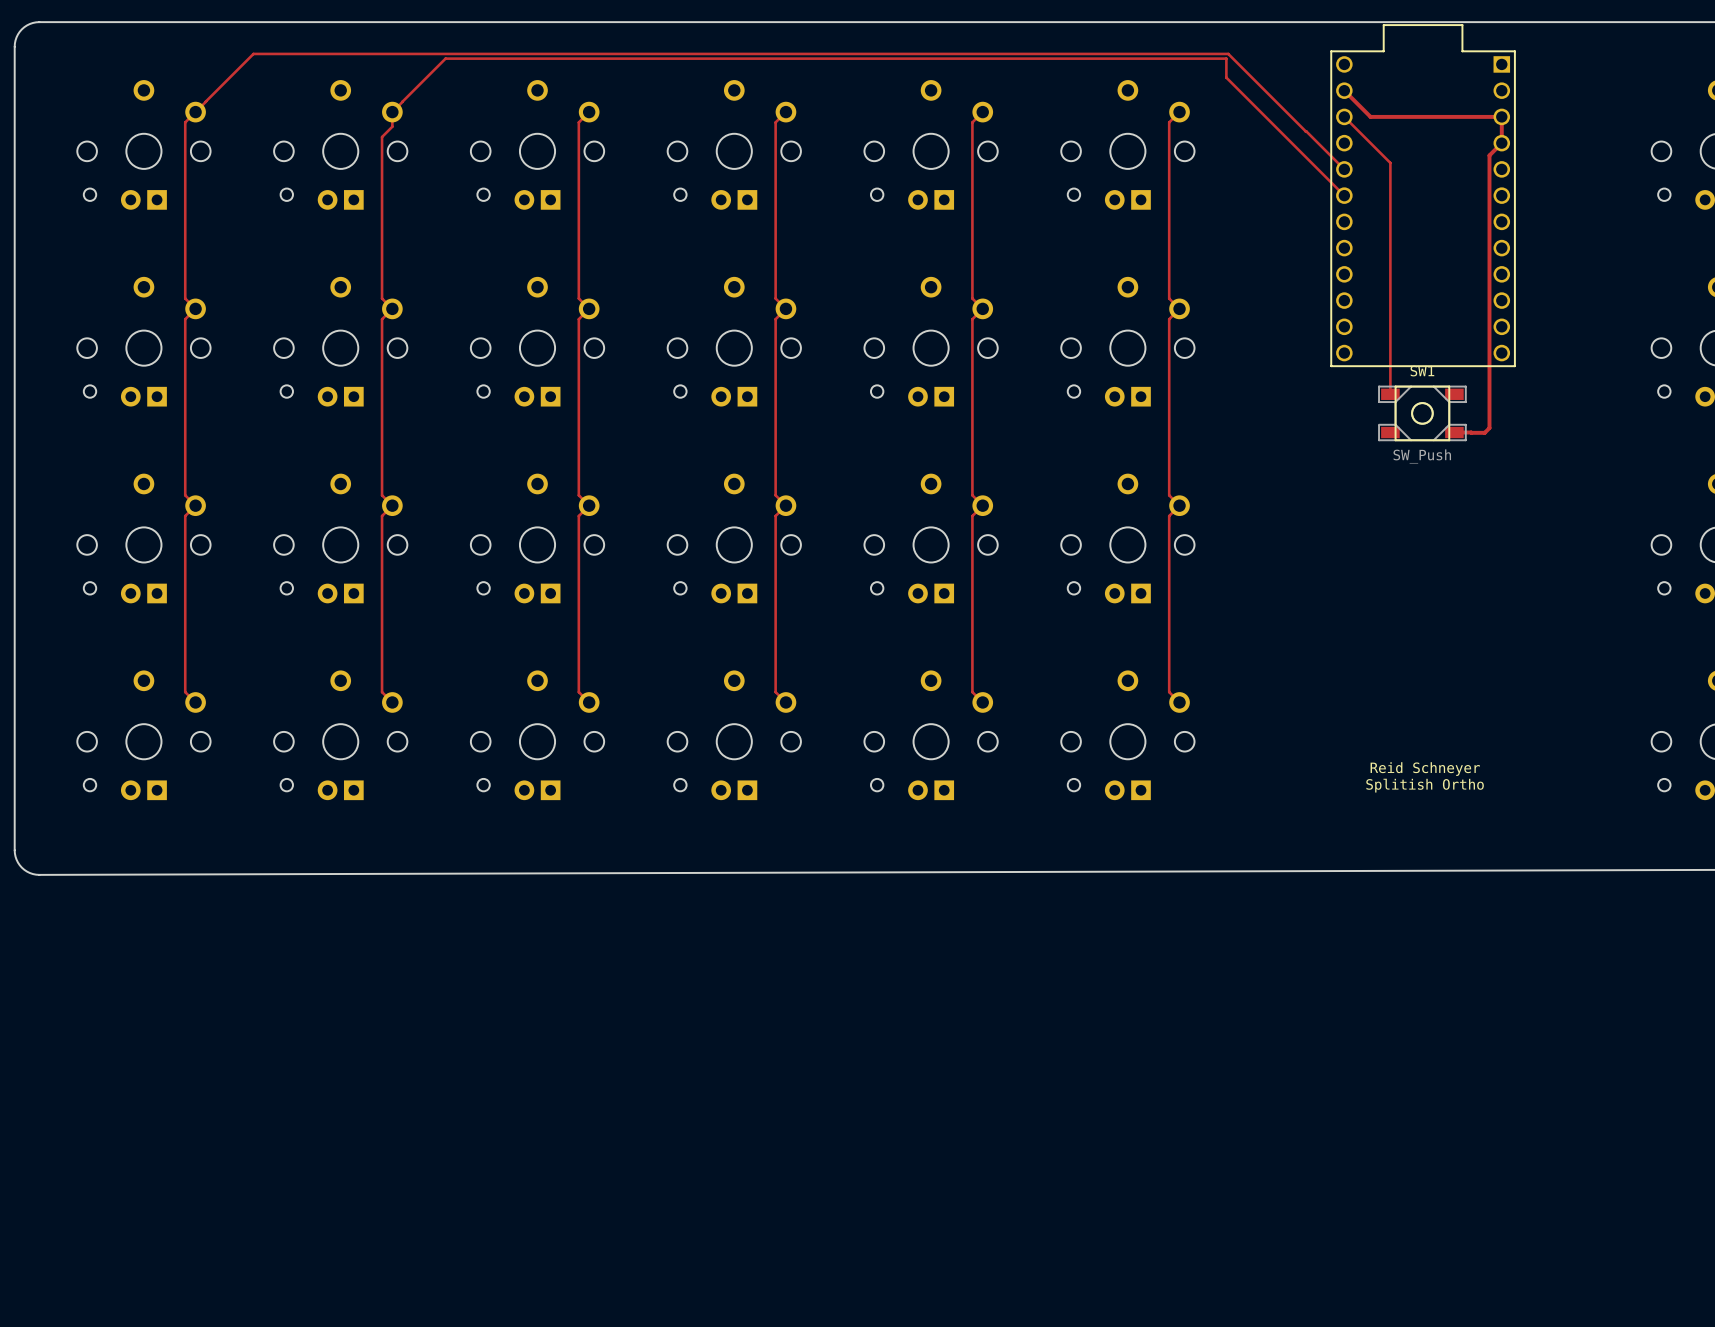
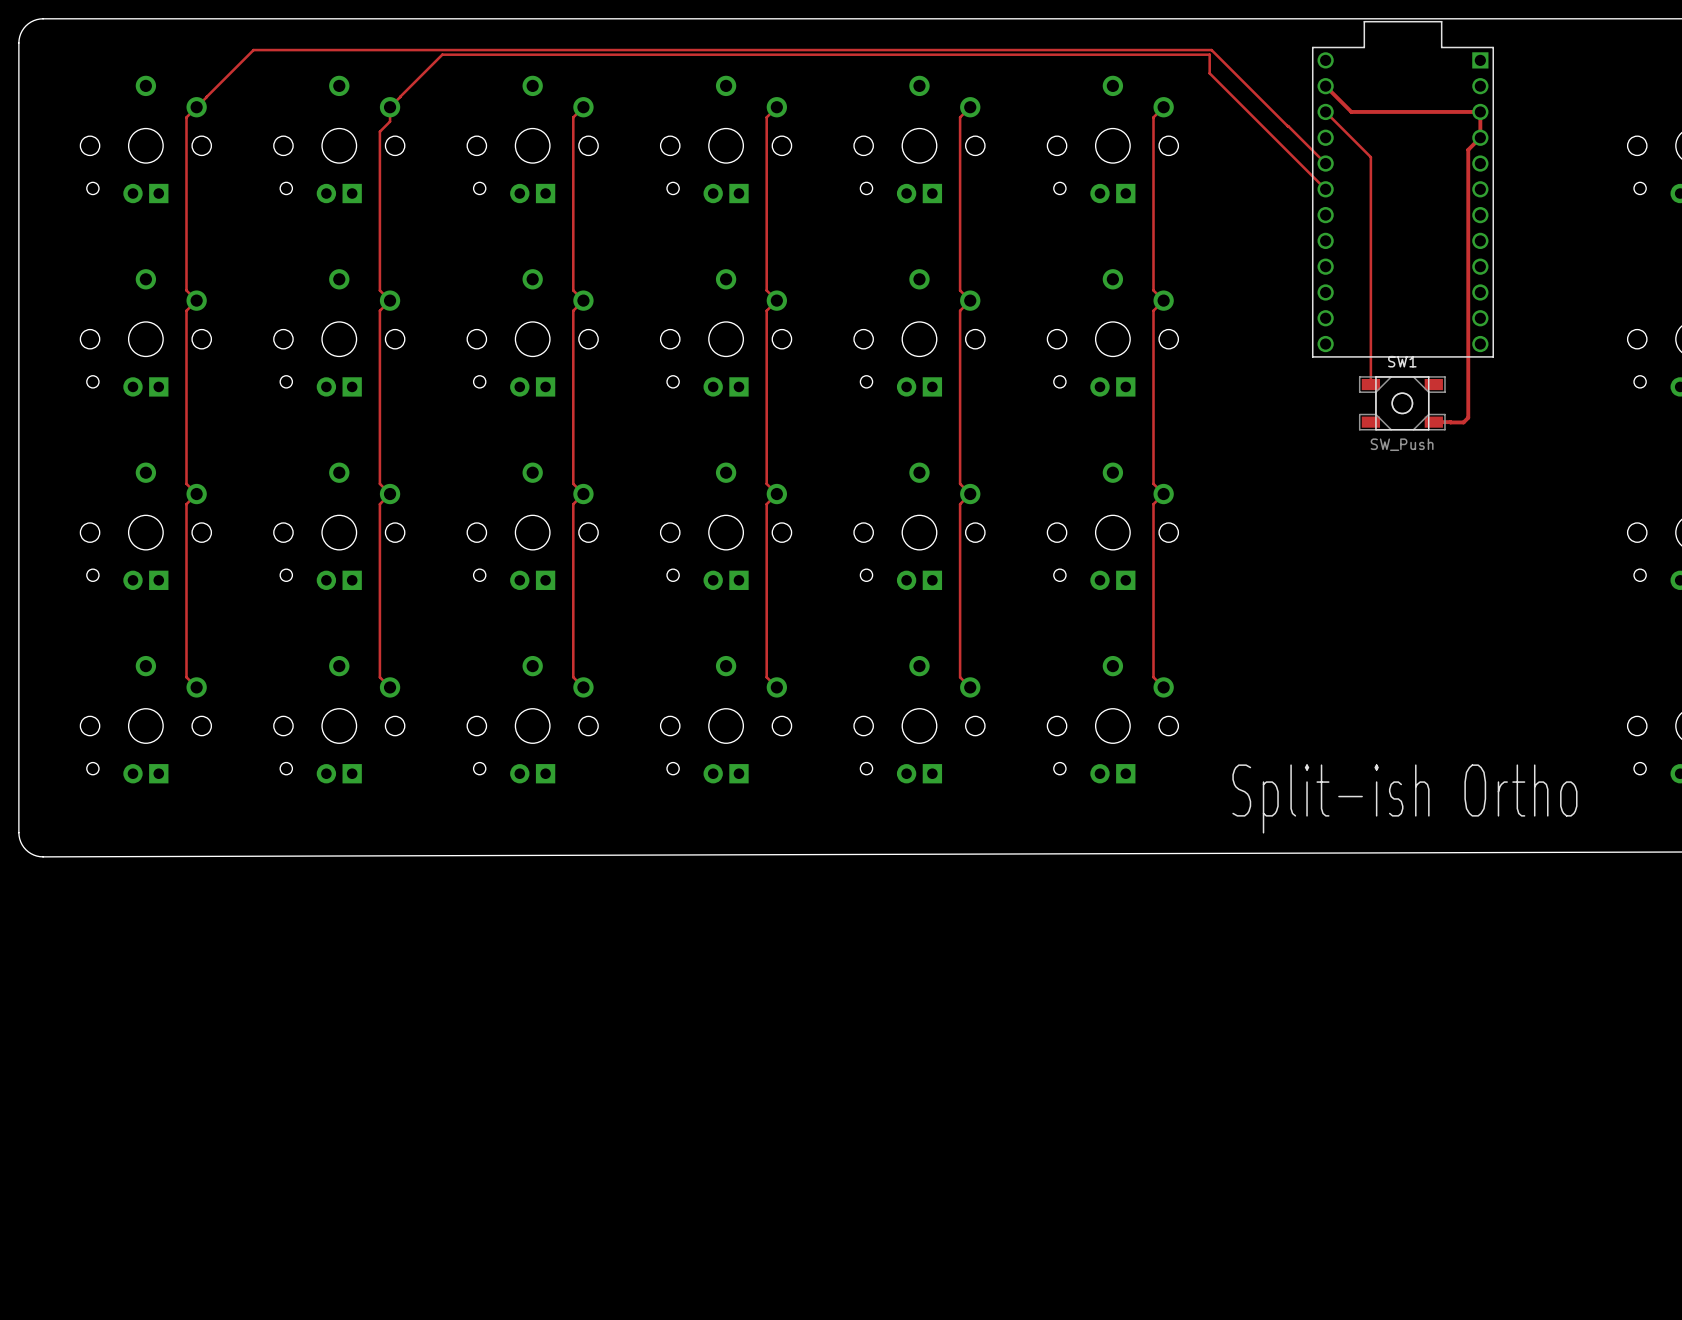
text: Reid Schneyer (1425, 769) -> none
text: Splitish Ortho (1425, 785) -> Split-ish Ortho (1404, 798)

